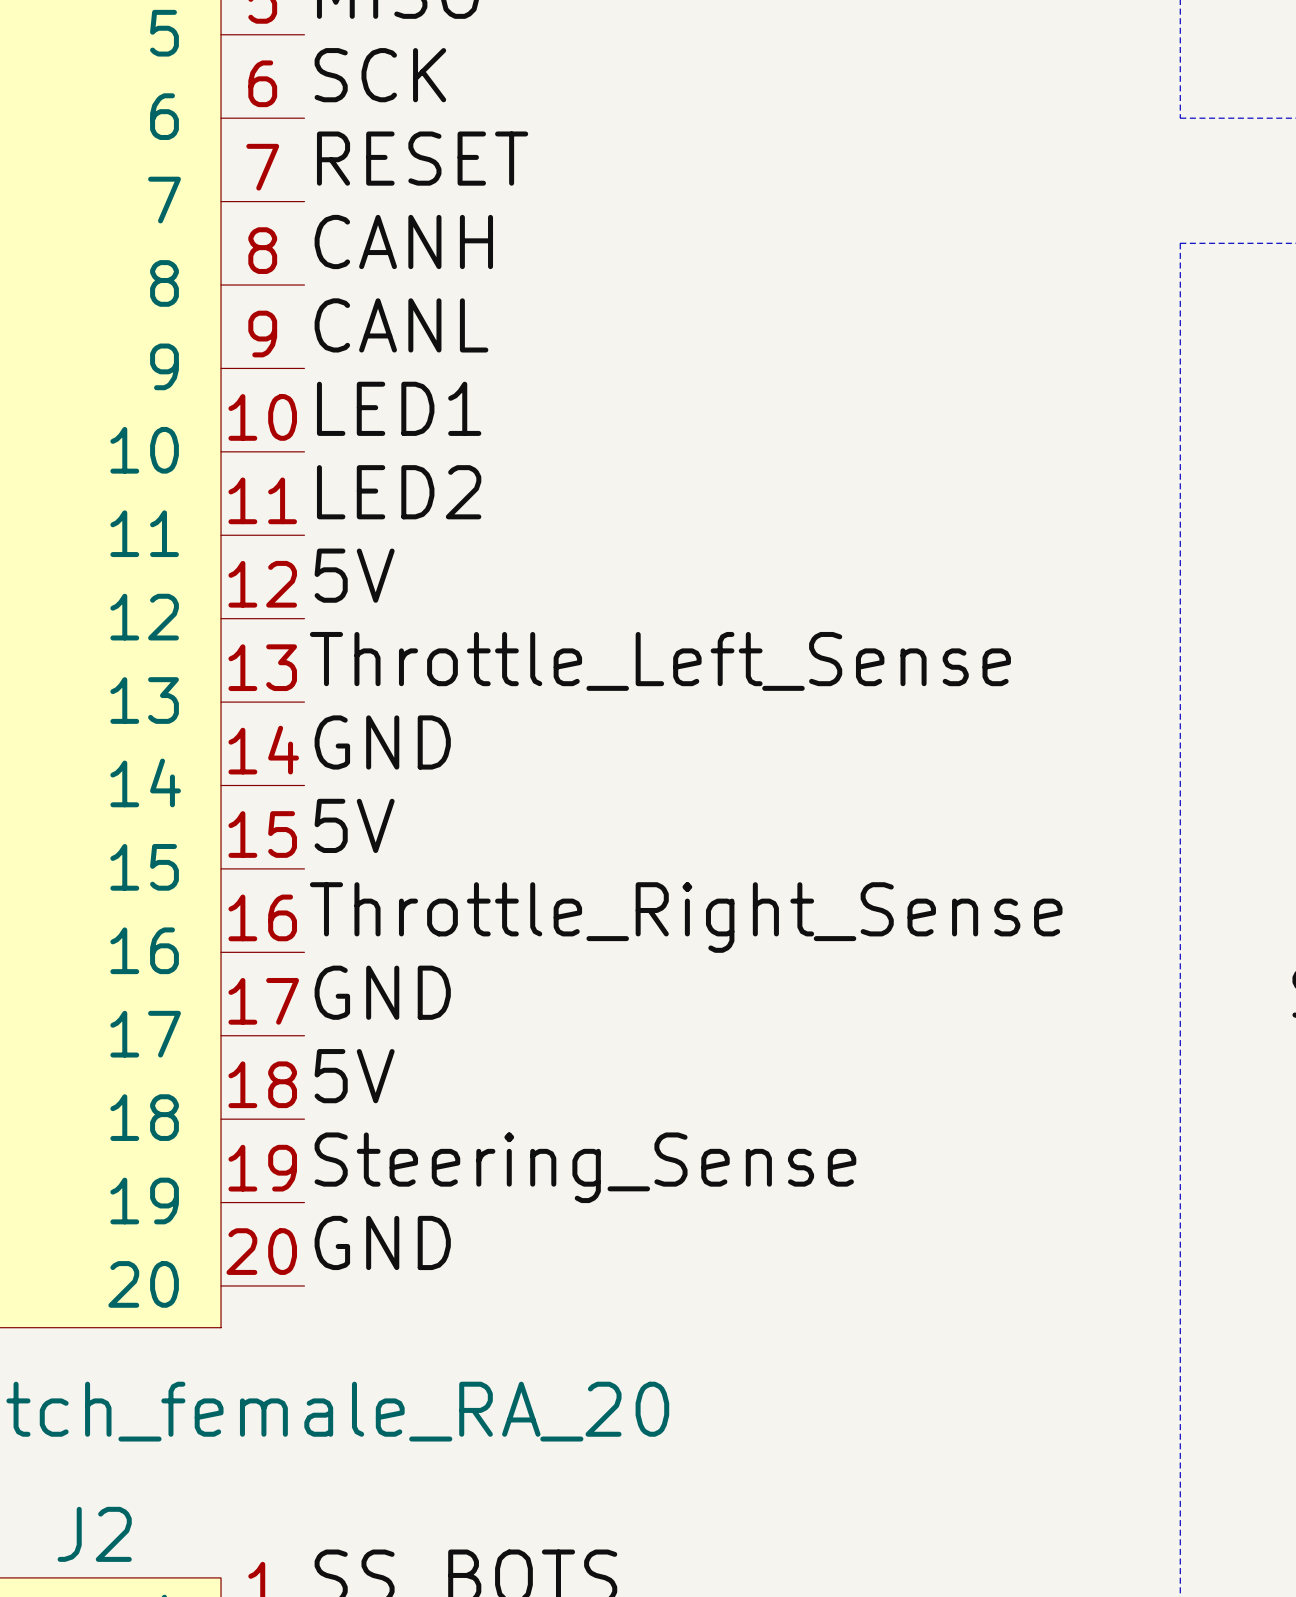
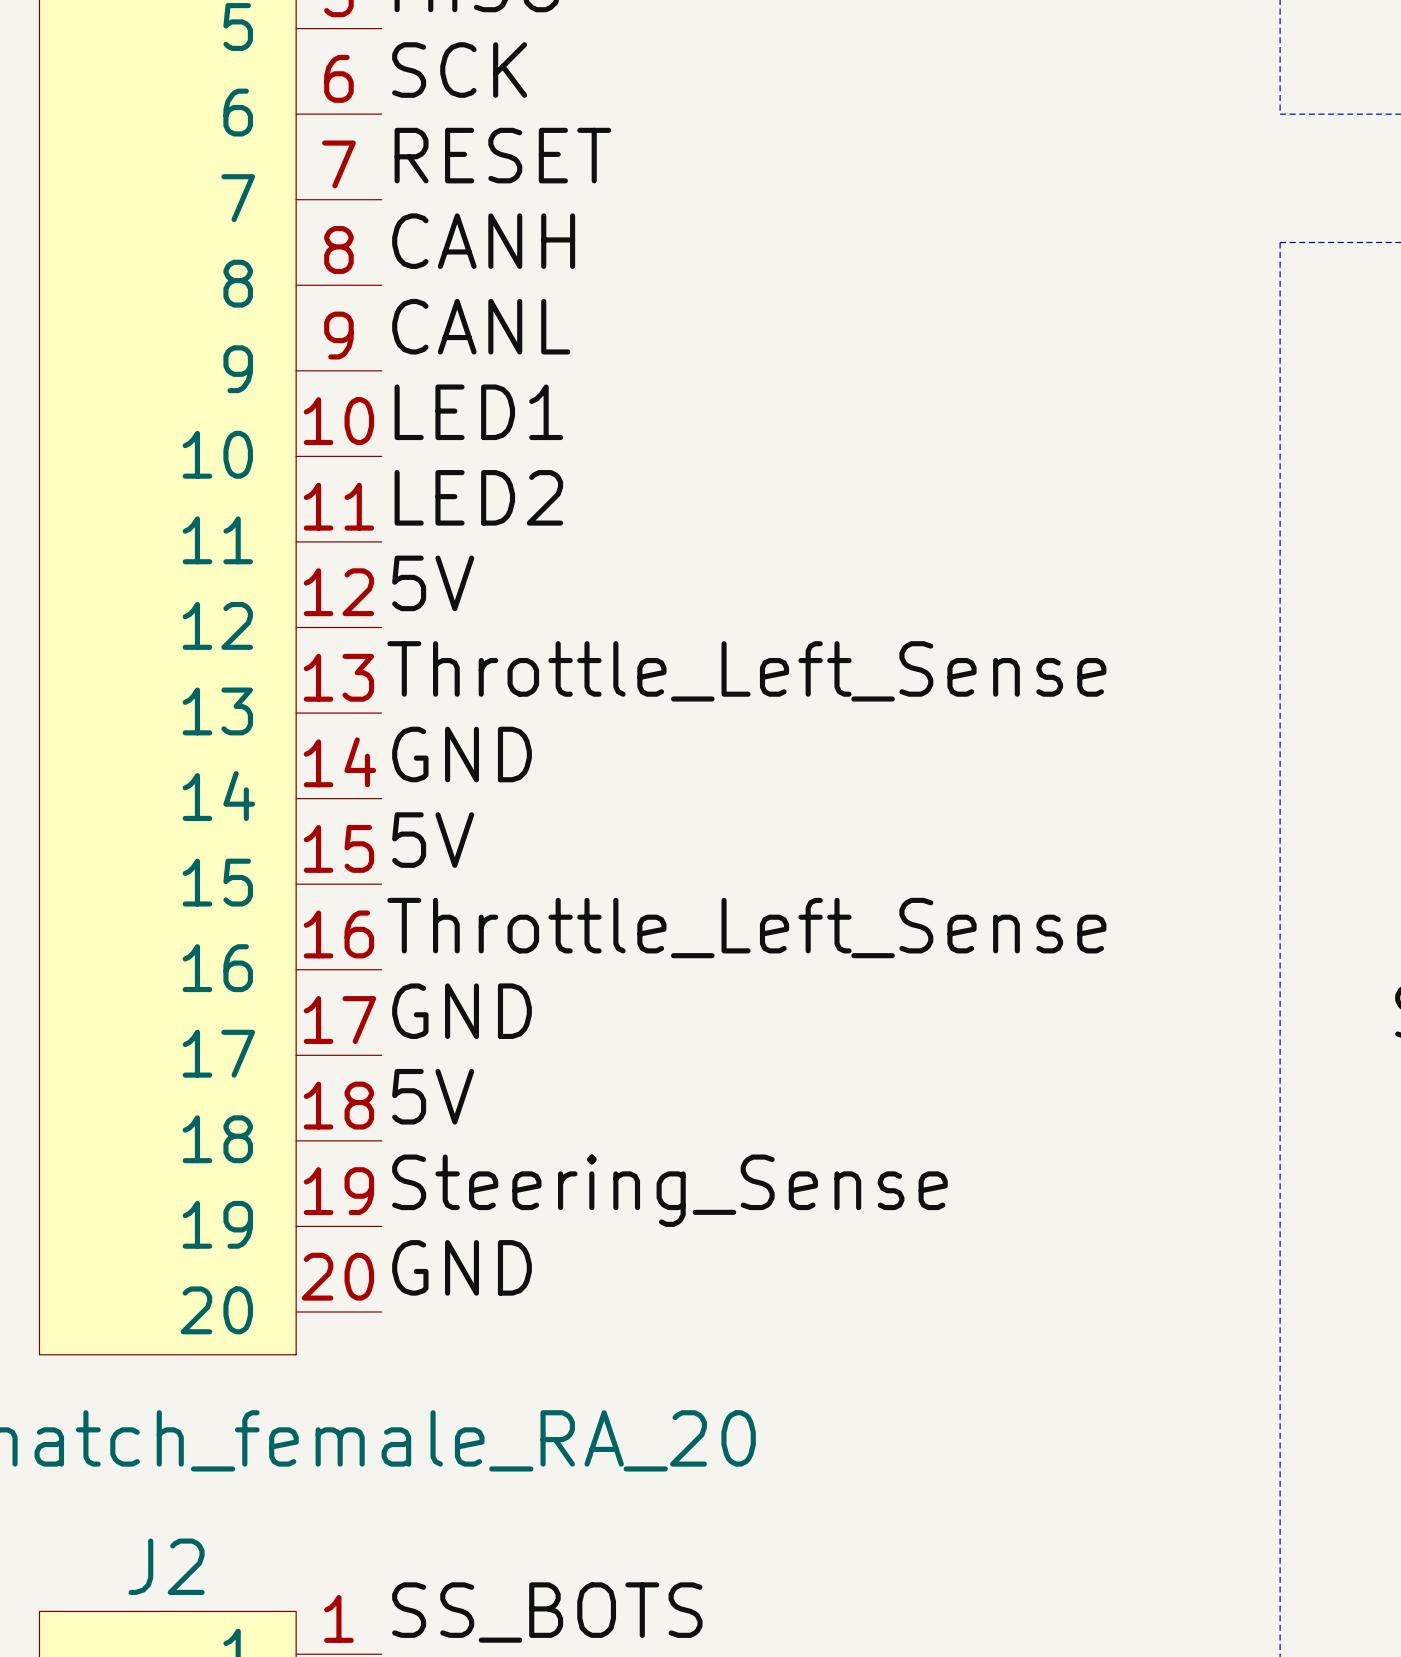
label: Throttle_Right_Sense (686, 917) -> Throttle_Left_Sense (746, 928)

